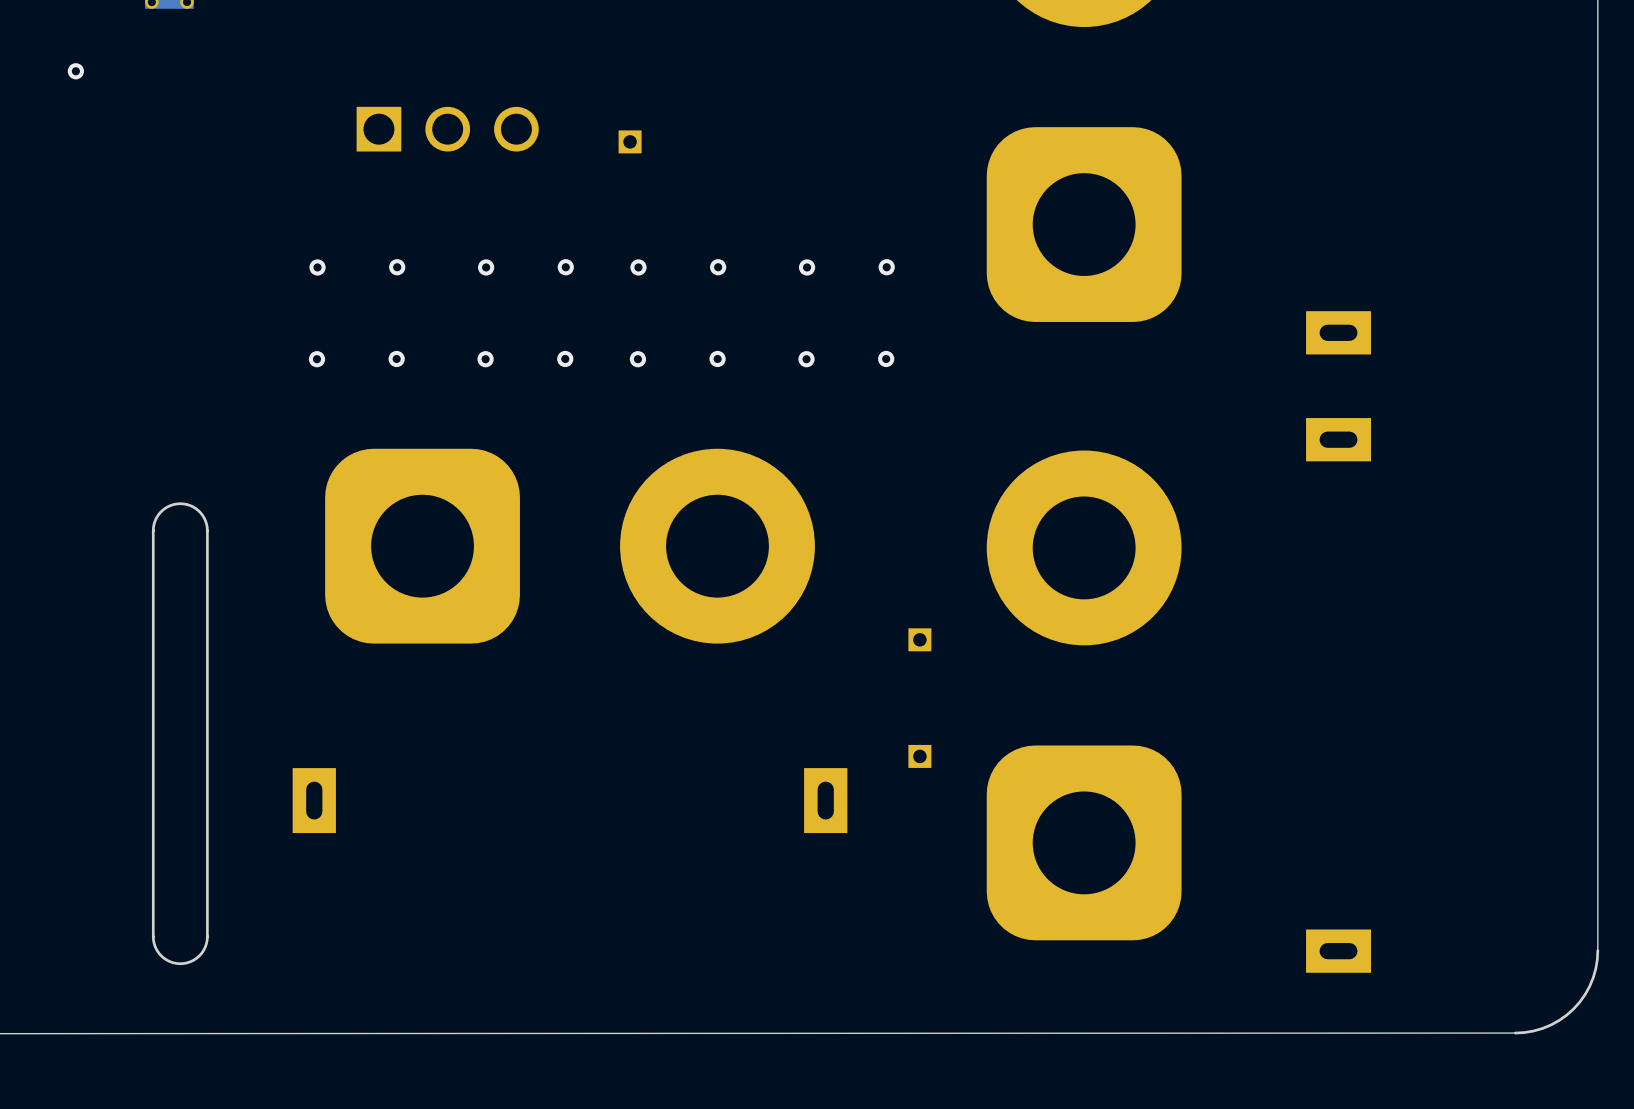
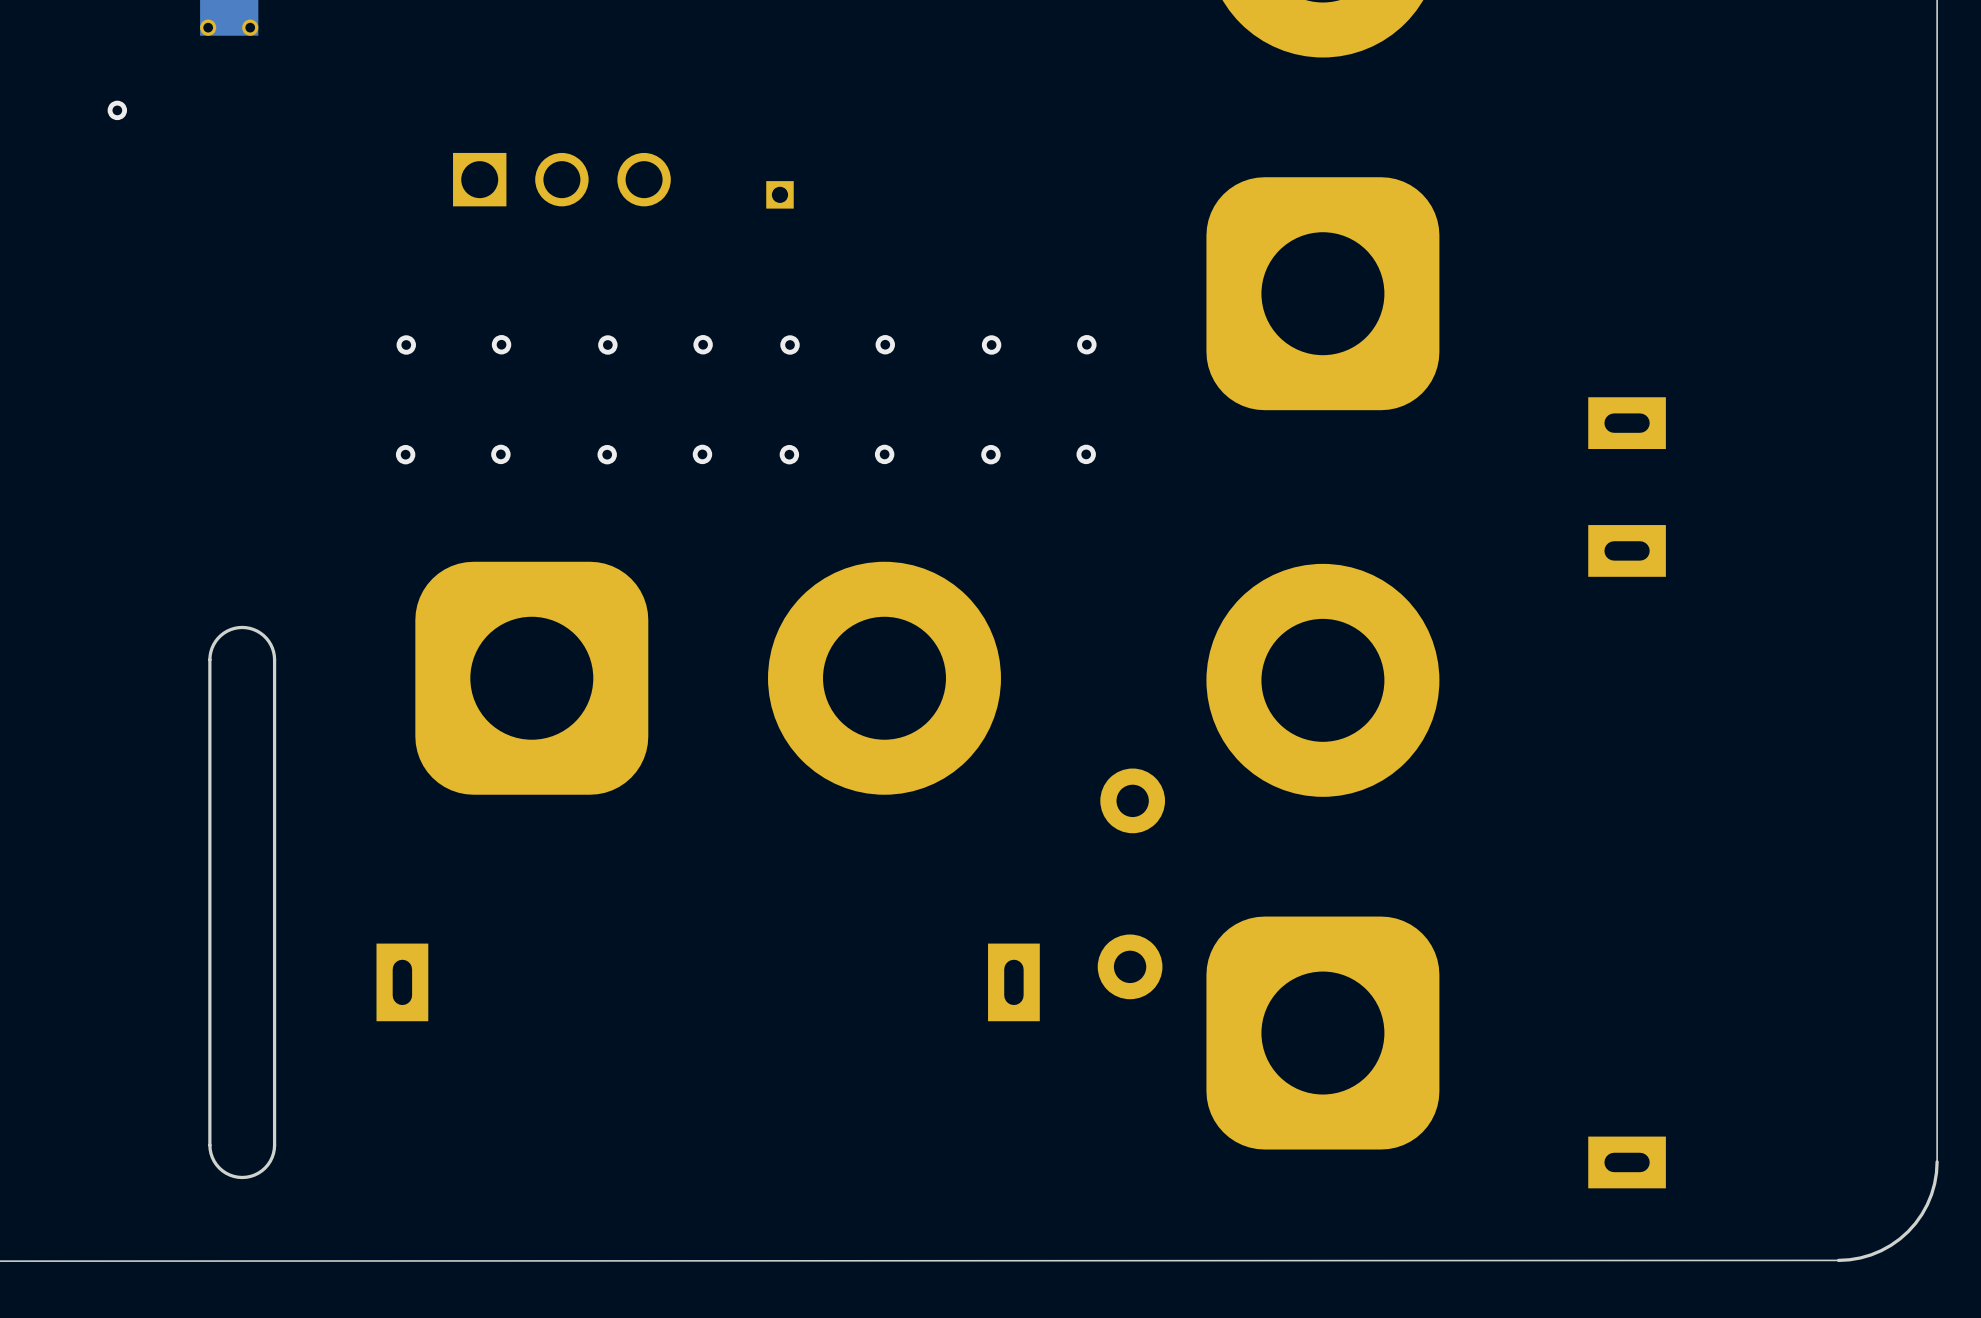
part footprint: [908, 628, 932, 652] -> [1100, 768, 1166, 834]
part: (919, 756) -> none
part: none -> (1130, 966)

